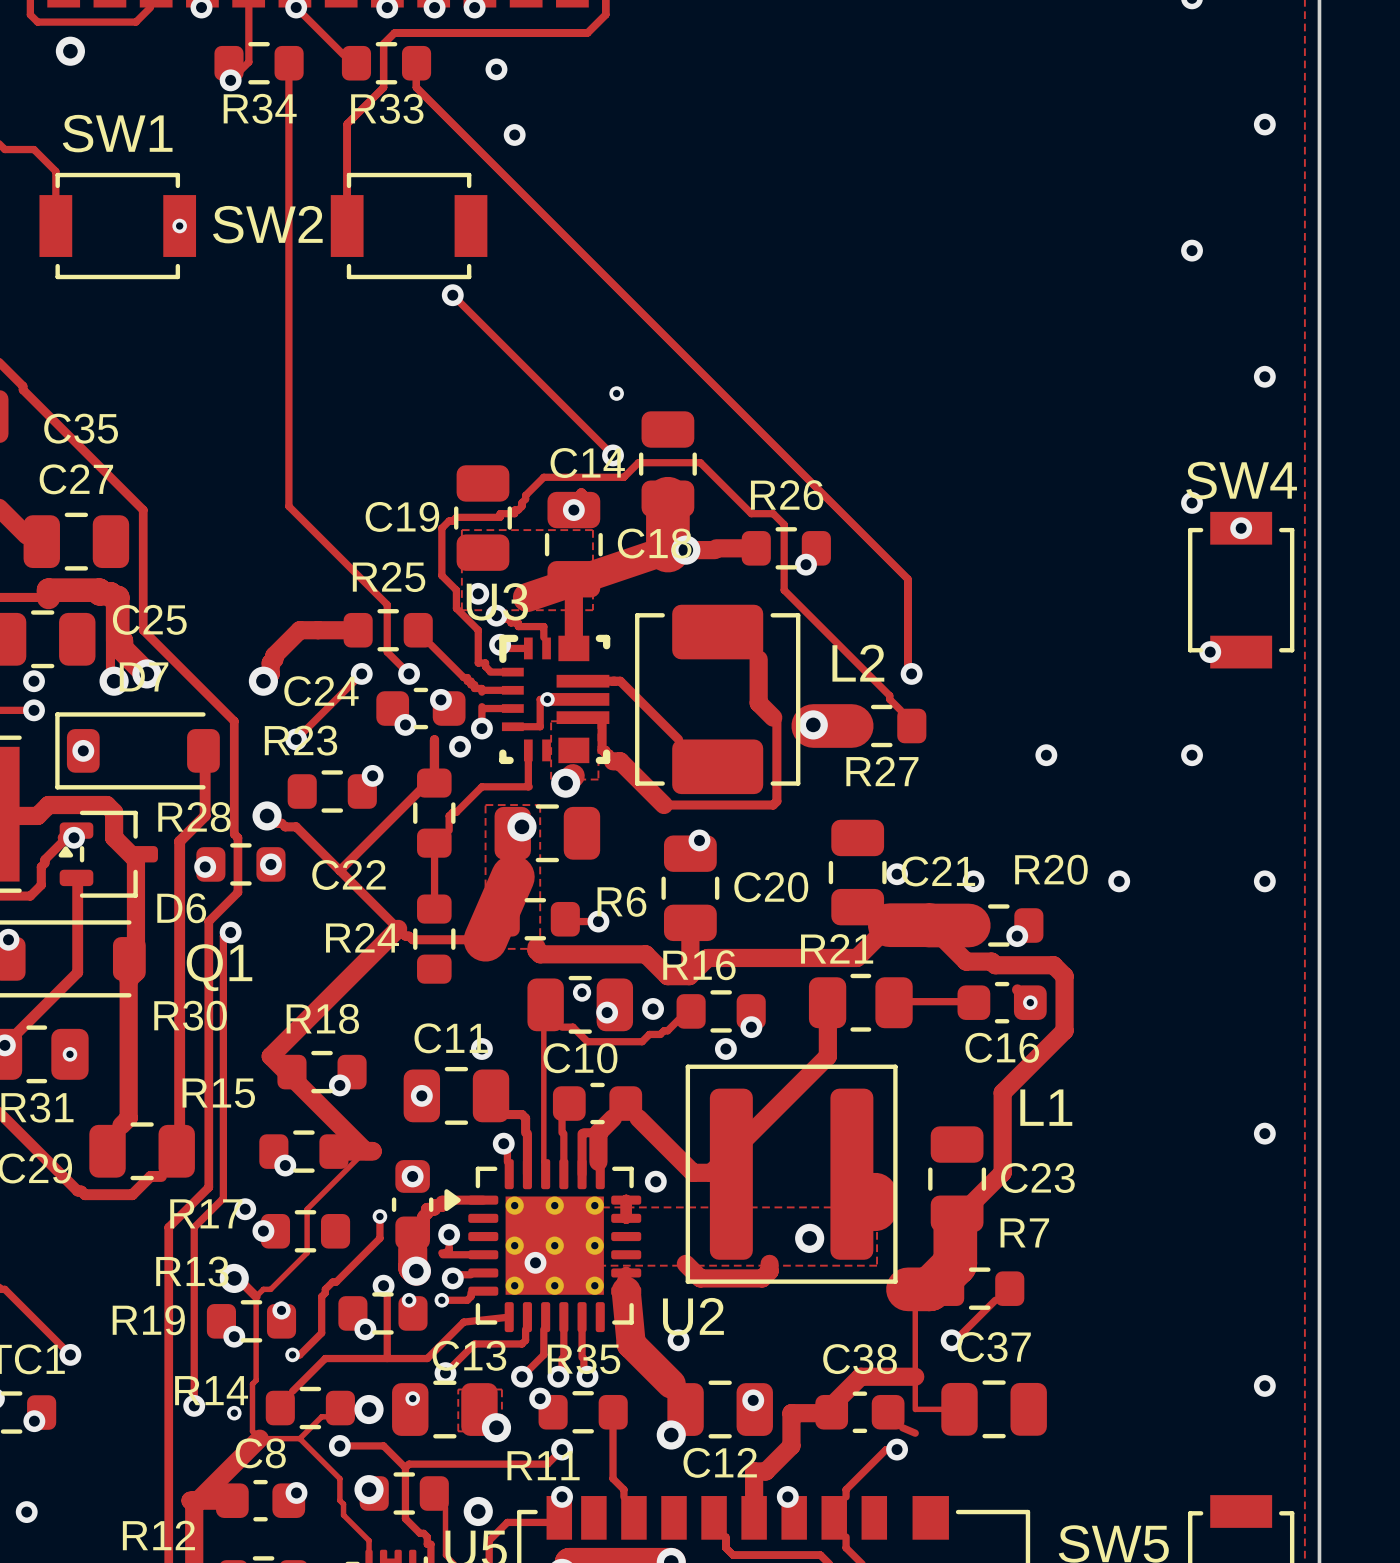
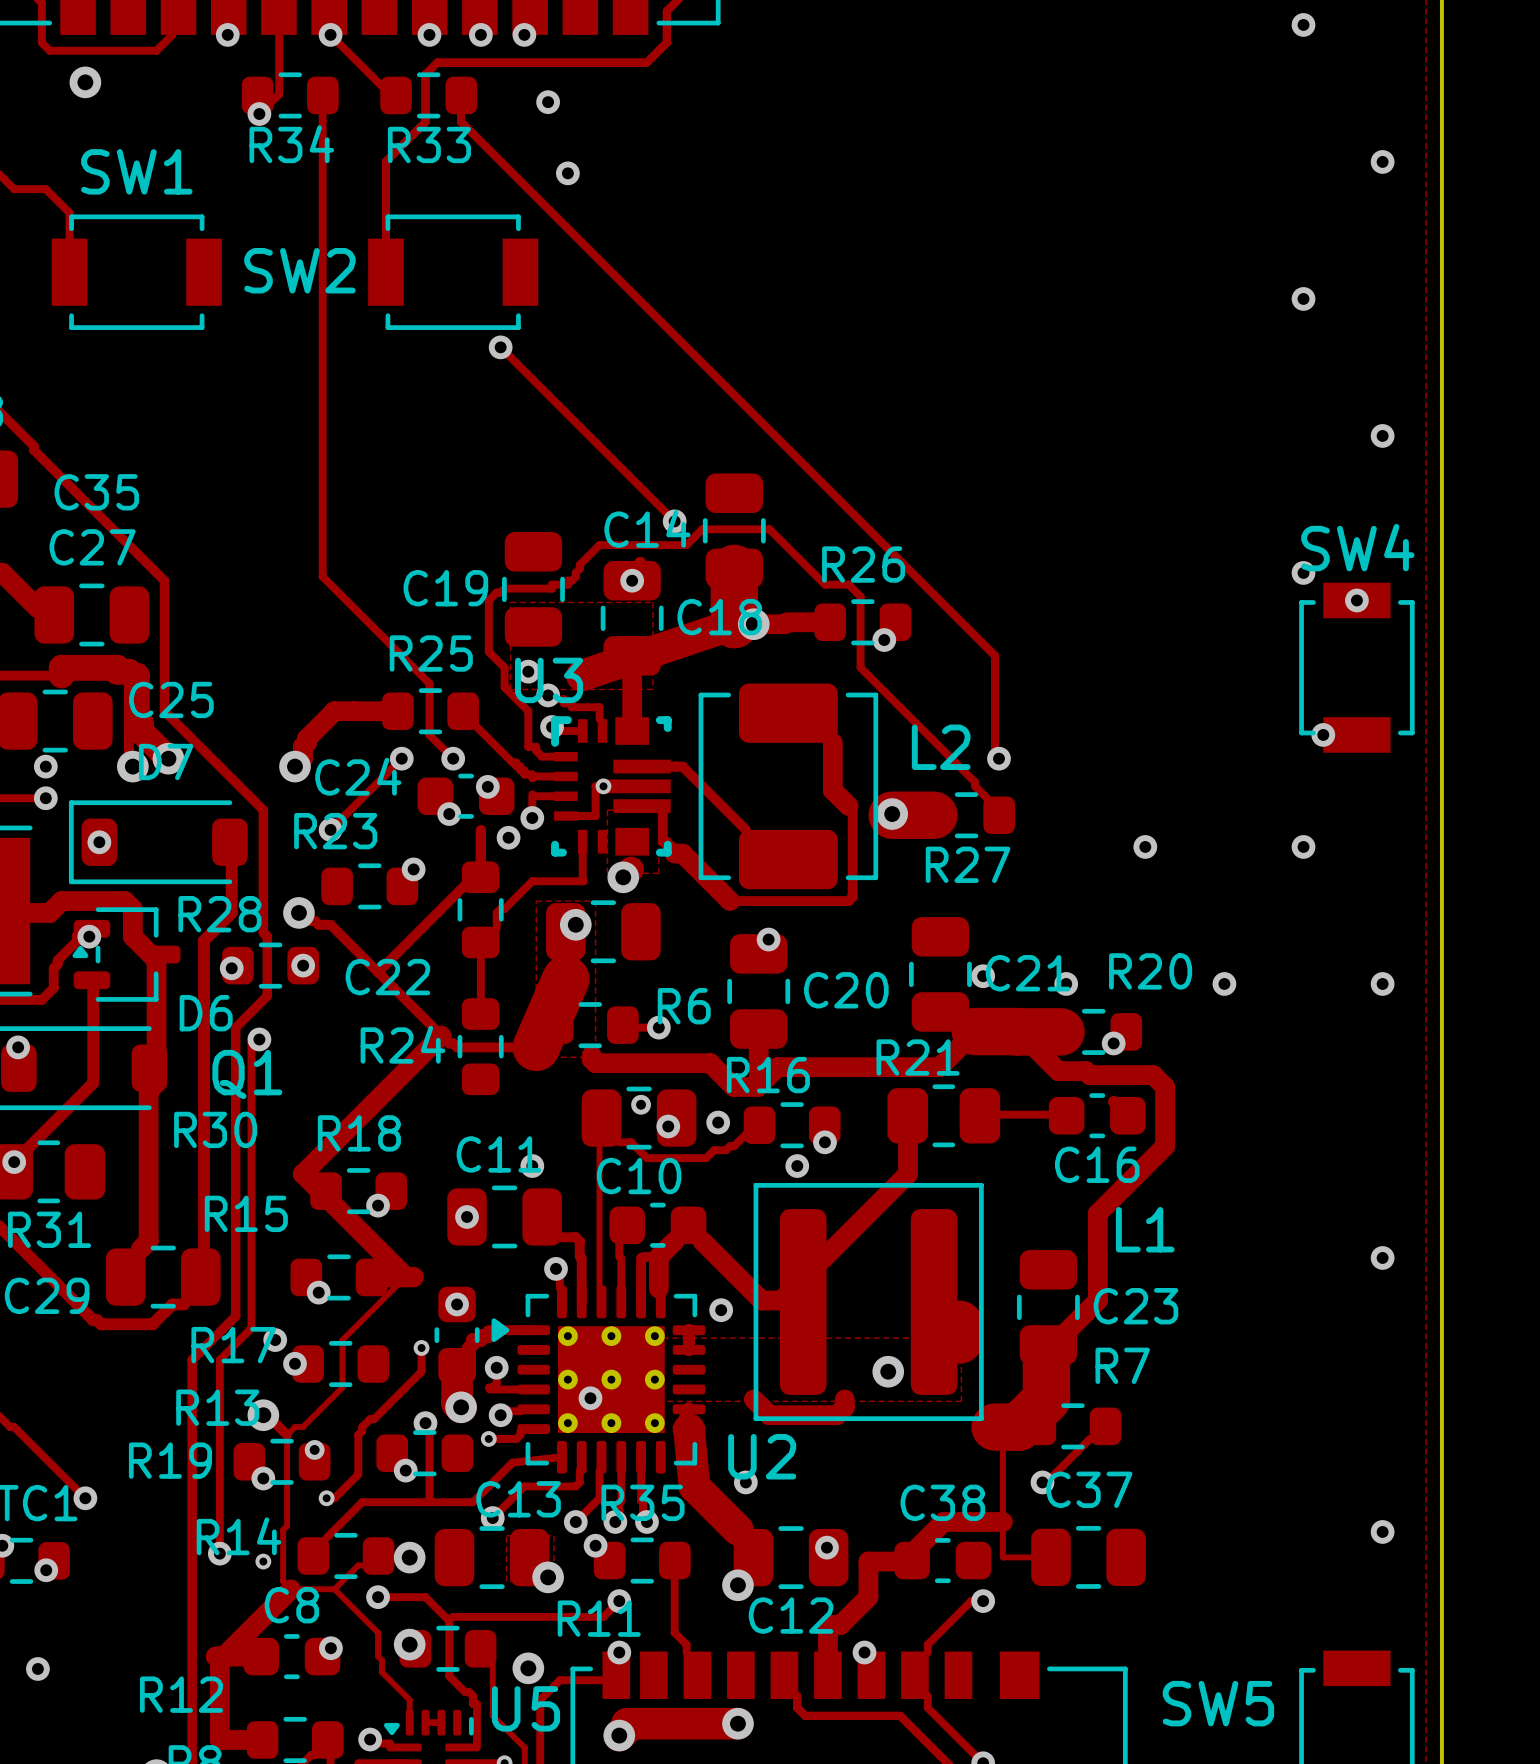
via: (179, 226) -> none
via: (616, 393) -> none
via: (1030, 1002) -> none
via: (69, 1054) -> none
via: (409, 1300) -> none
via: (412, 1398) -> none
track: (902, 1427) (915, 1433) -> none

